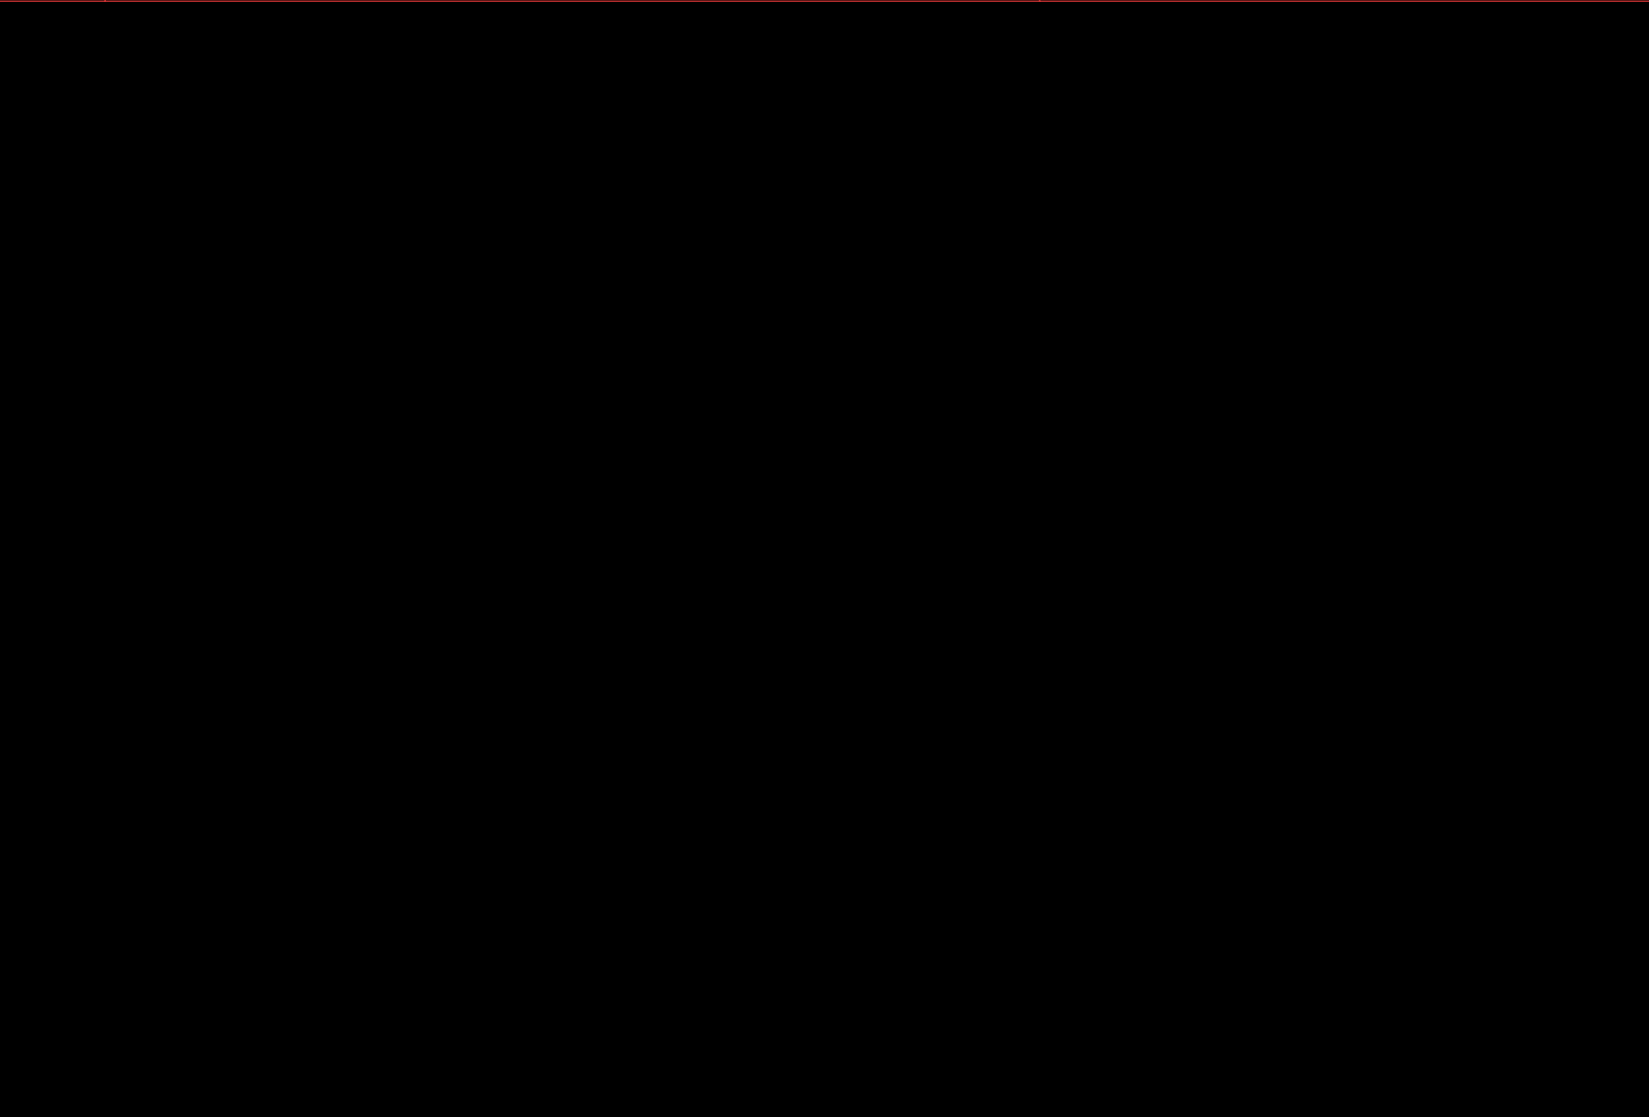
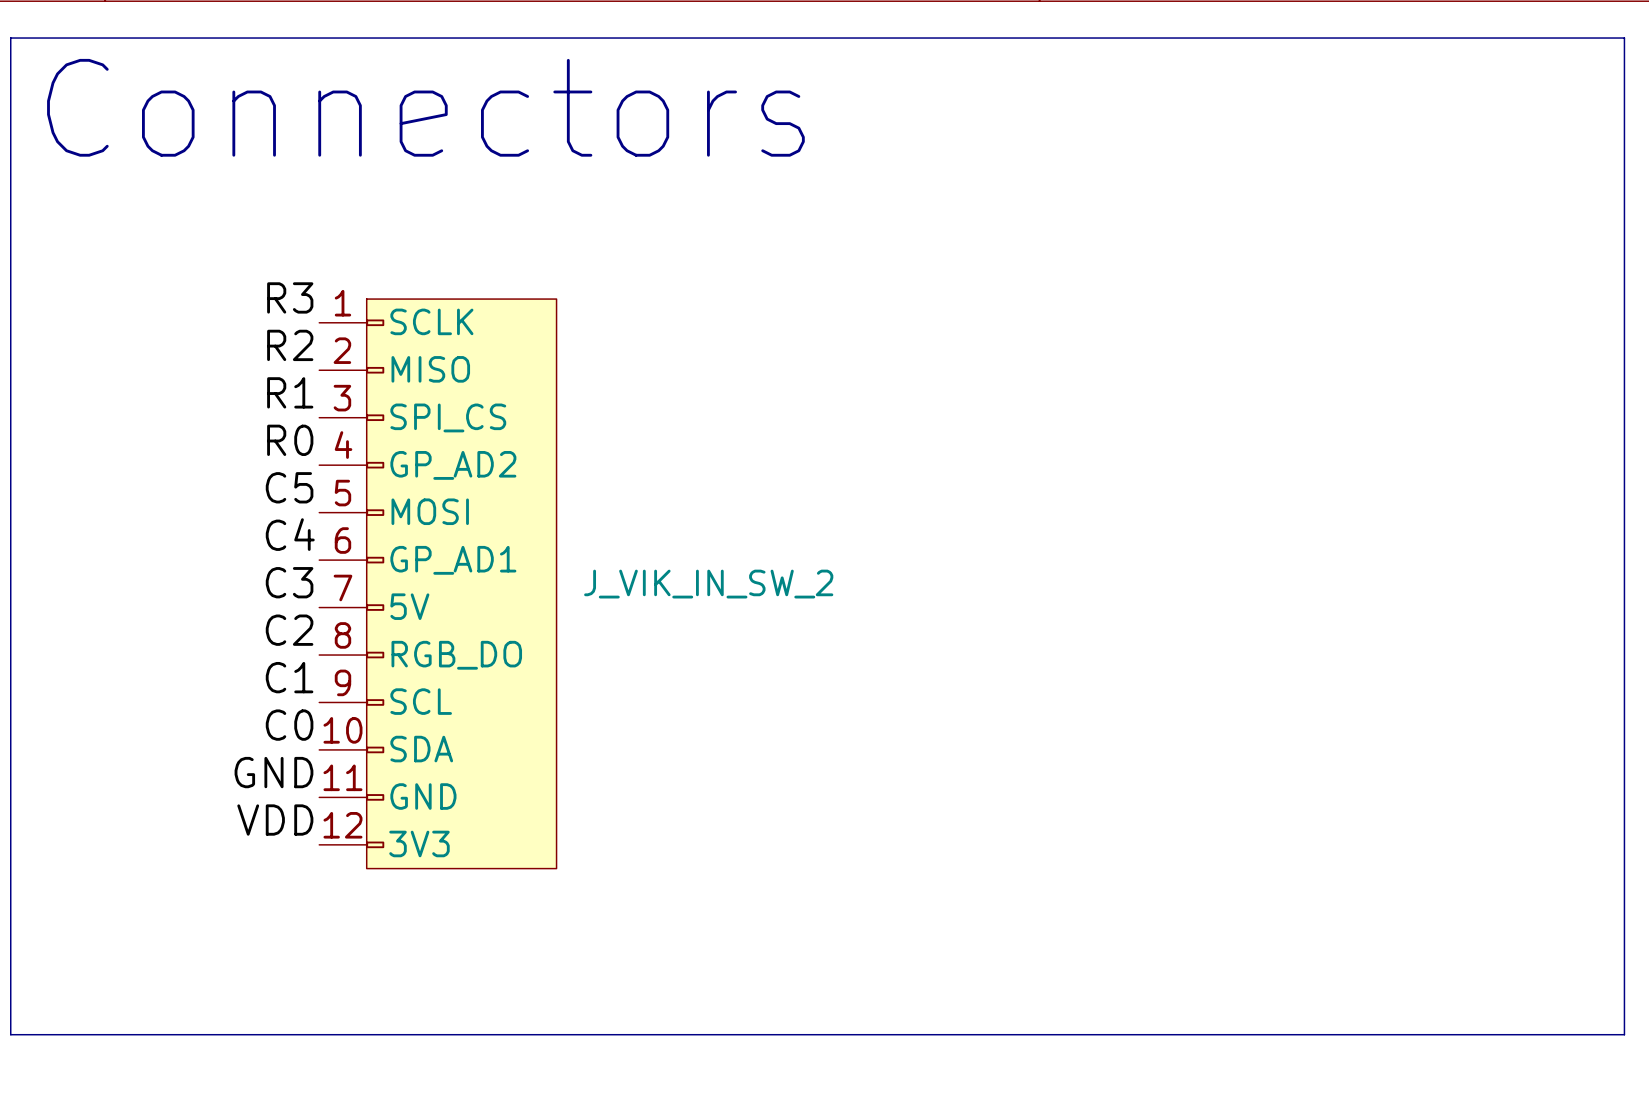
line: none -> (10, 38) (1624, 38) (1624, 1034) (10, 1034) (10, 38)
text: none -> Connectors (425, 107)
label: none -> R3 (290, 297)
label: none -> R2 (290, 345)
label: none -> R1 (290, 392)
label: none -> R0 (290, 440)
label: none -> C5 (289, 487)
label: none -> C4 (290, 534)
label: none -> C3 (289, 582)
J_VIK_IN_SW_2: none -> (437, 583)
label: none -> C2 (289, 630)
label: none -> C1 (289, 677)
label: none -> C0 (289, 725)
label: none -> GND (273, 772)
label: none -> VDD (275, 820)

